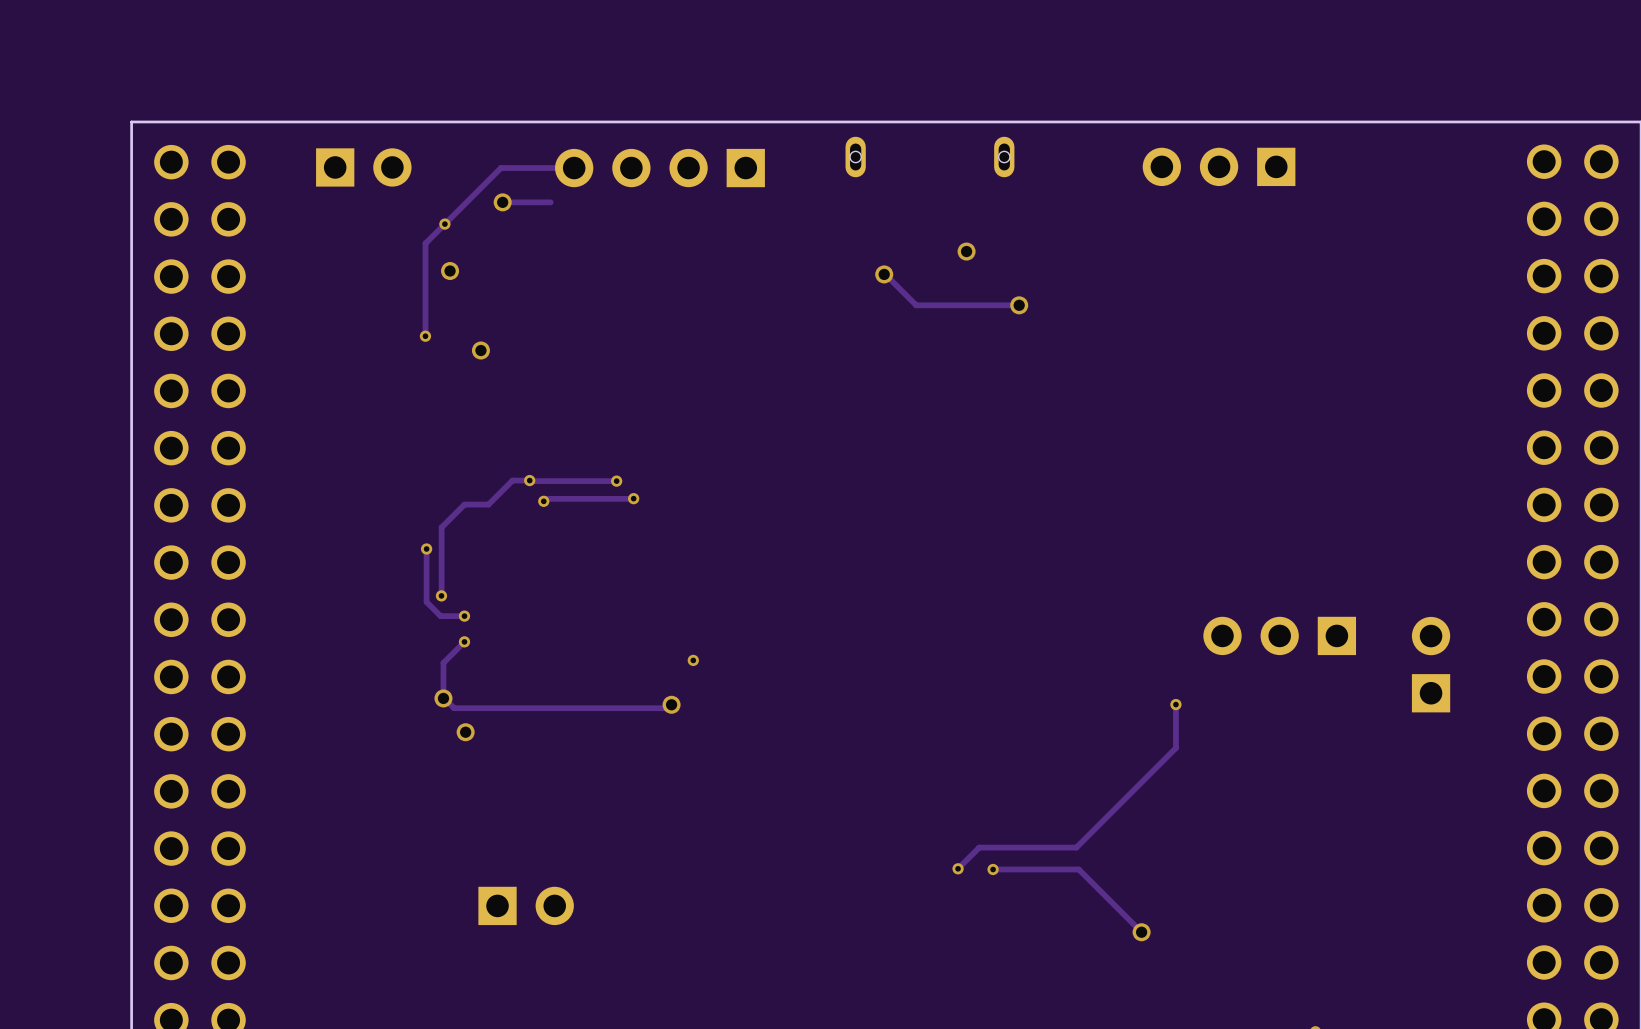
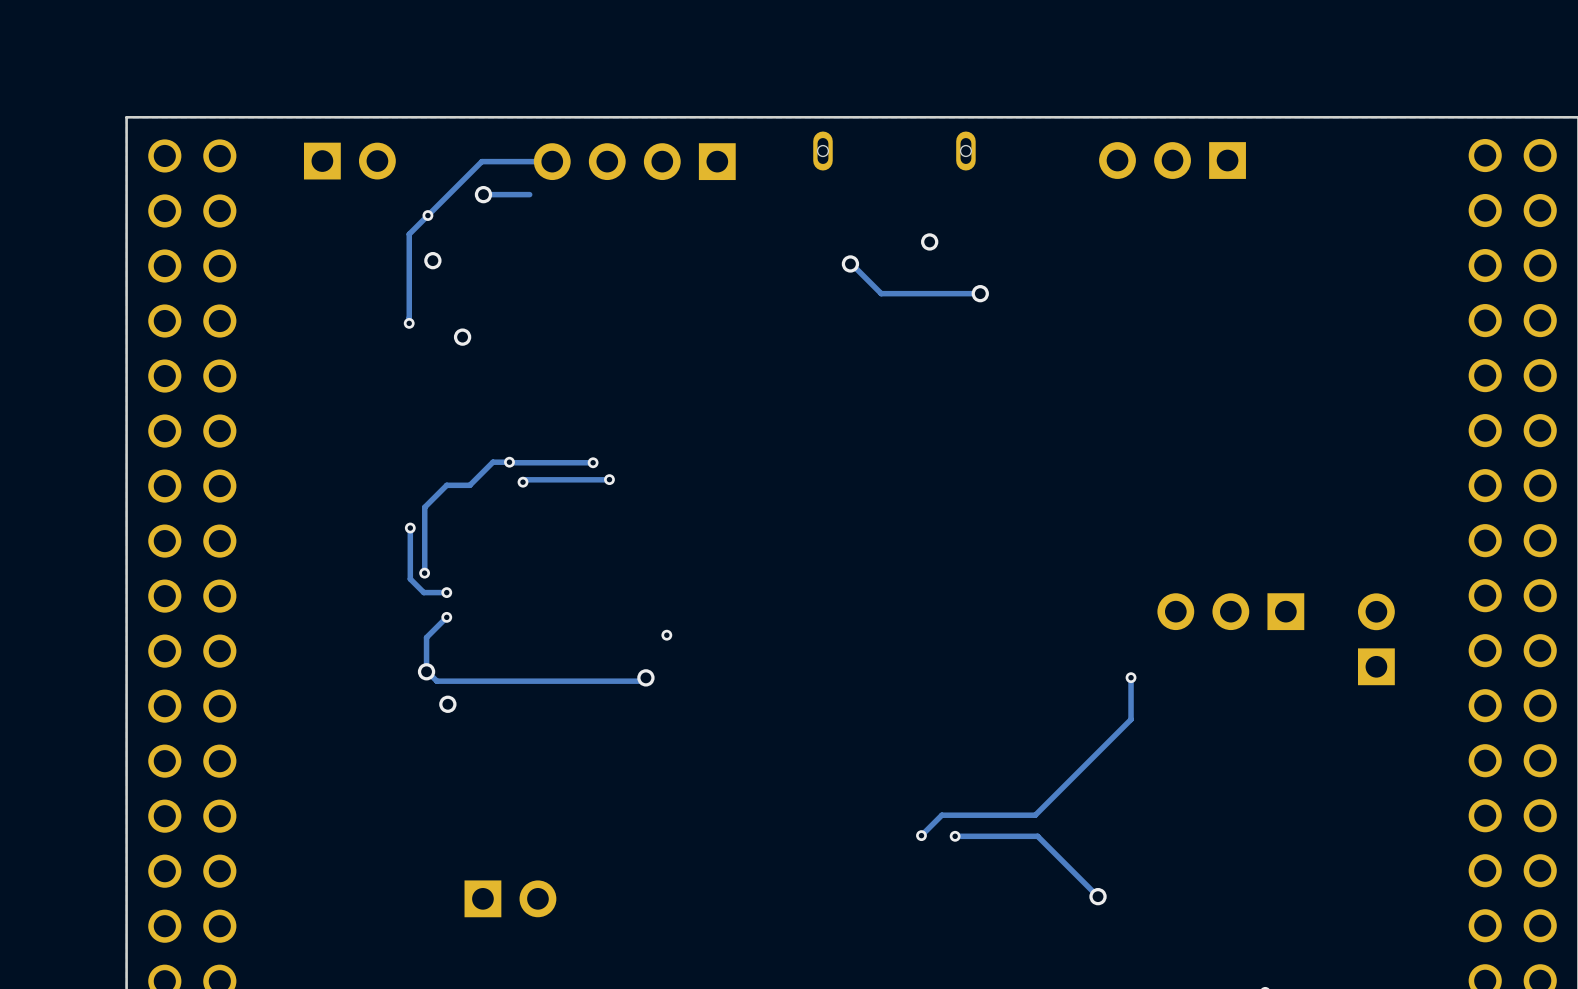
part position: (526, 905) -> (510, 898)

